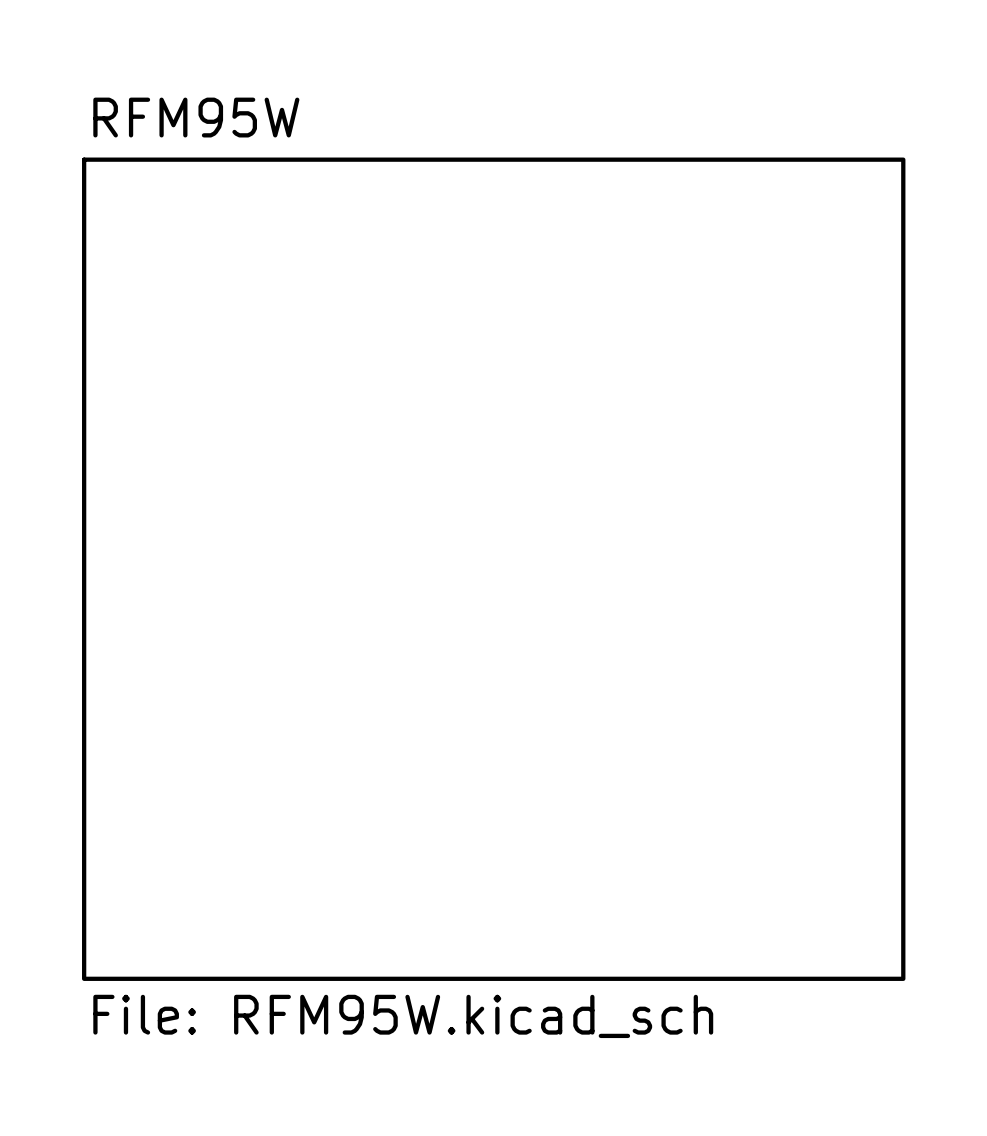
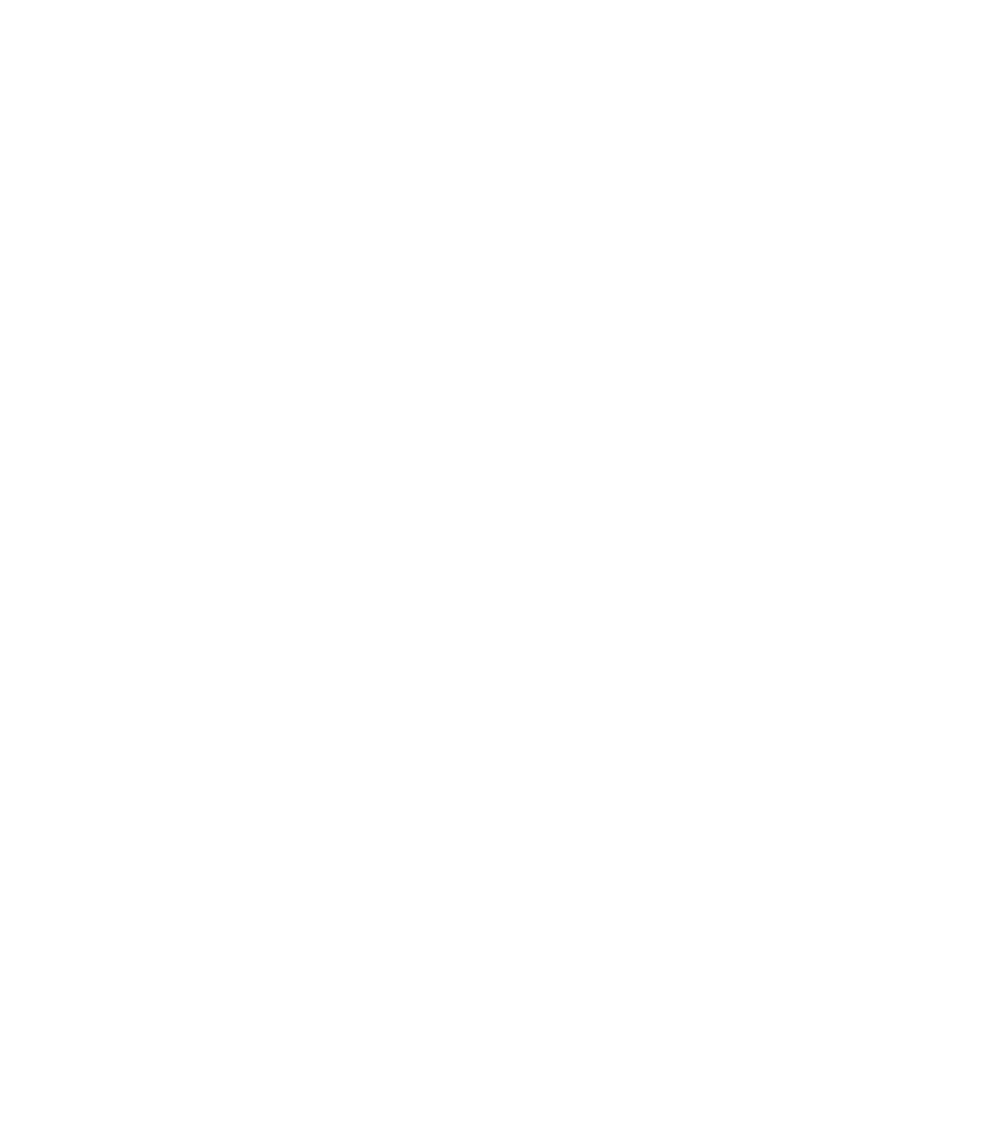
sheet RFM95W: File: RFM95W.kicad_sch (493, 569) -> none

